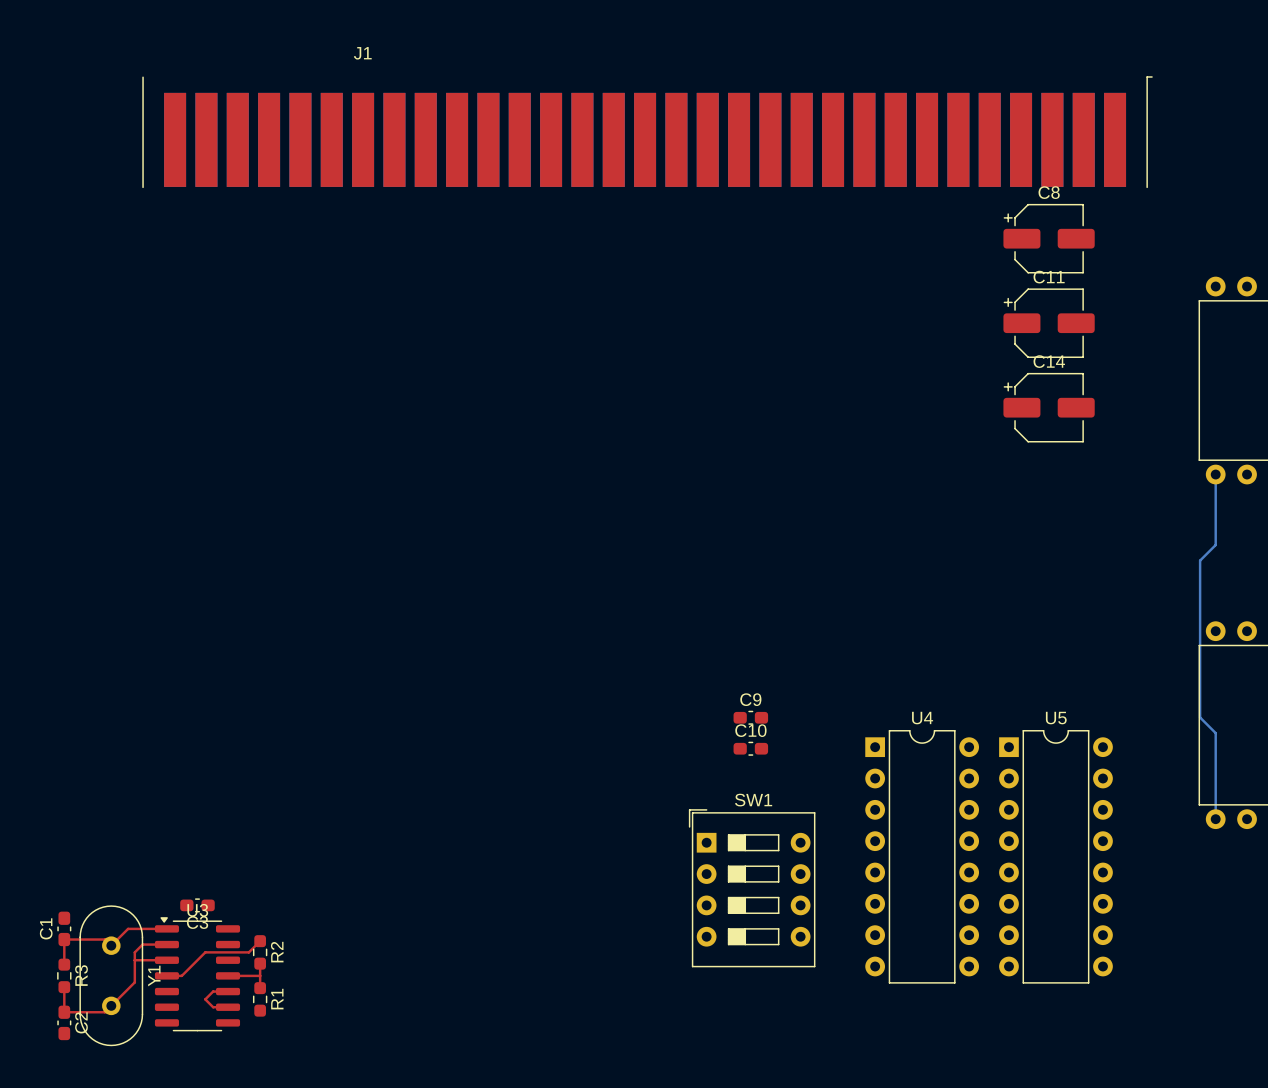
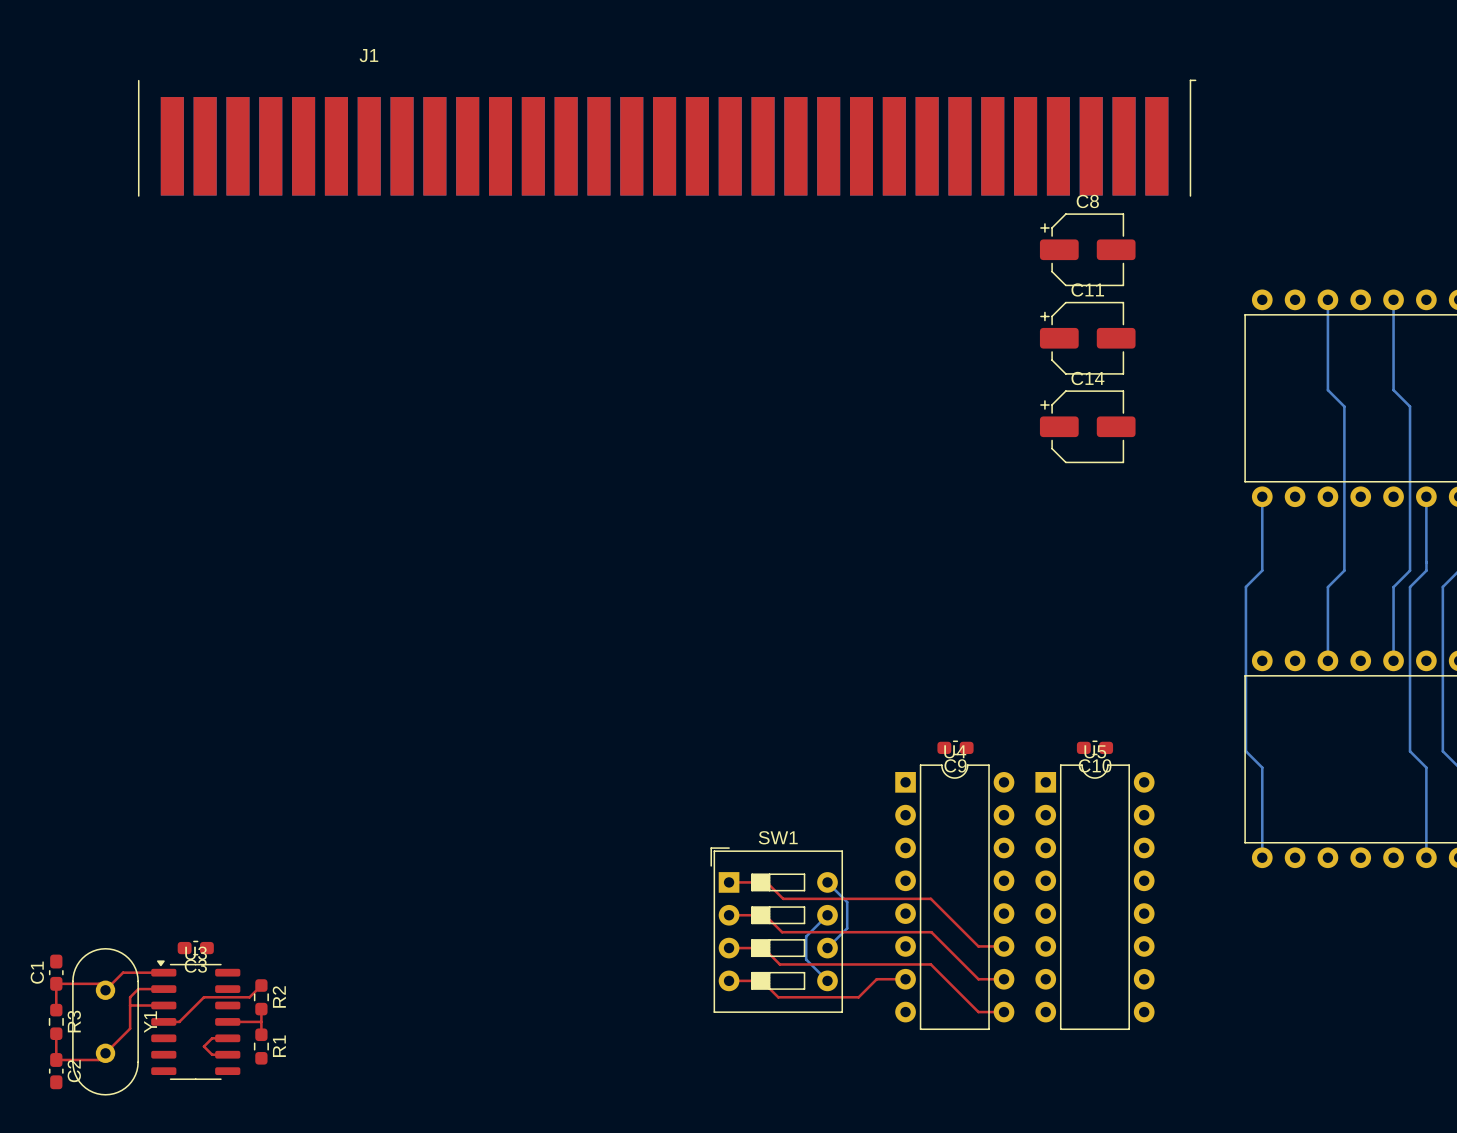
C9 name position: C9 (750, 699) -> C9 (955, 765)
C9 position: (750, 717) -> (955, 747)
C10 name position: C10 (750, 730) -> C10 (1095, 765)
C10 position: (750, 748) -> (1094, 747)
top track: none -> (729, 882) (766, 882) (783, 898) (930, 898) (978, 946) (1004, 946)
bottom track: none -> (827, 882) (847, 902) (847, 928) (827, 948)
top track: none -> (729, 915) (765, 915) (782, 932) (931, 932) (978, 979) (1004, 979)
bottom track: none -> (827, 915) (806, 936) (806, 959) (827, 980)
top track: none -> (729, 948) (763, 948) (779, 964) (930, 964) (978, 1012) (1004, 1012)
top track: none -> (905, 979) (876, 979) (858, 997) (778, 997) (761, 980) (729, 980)

